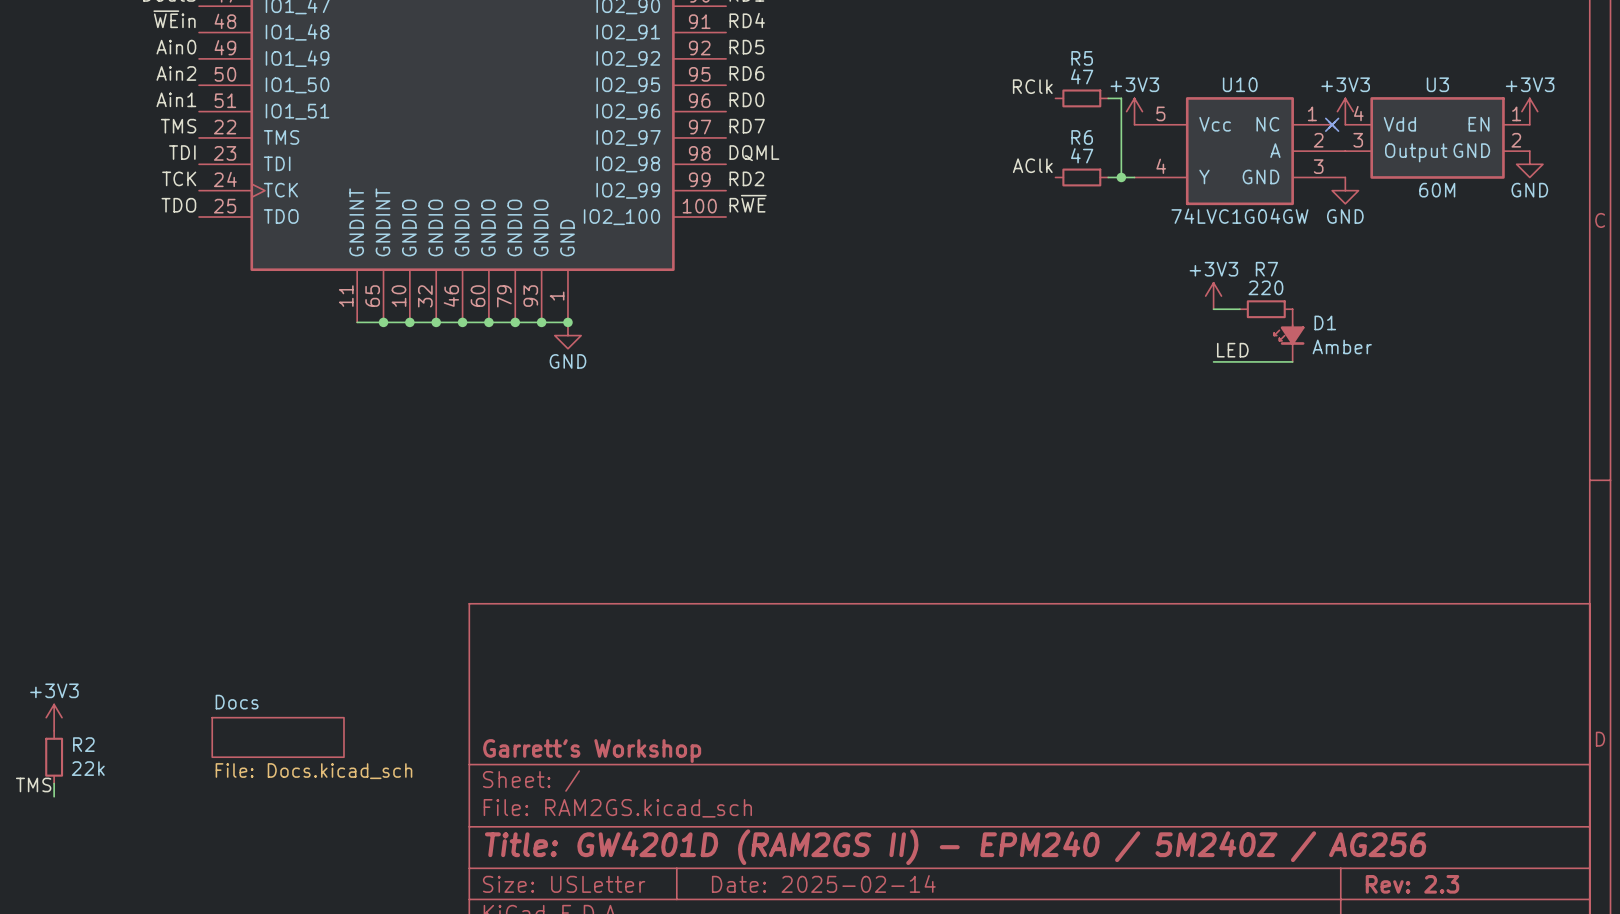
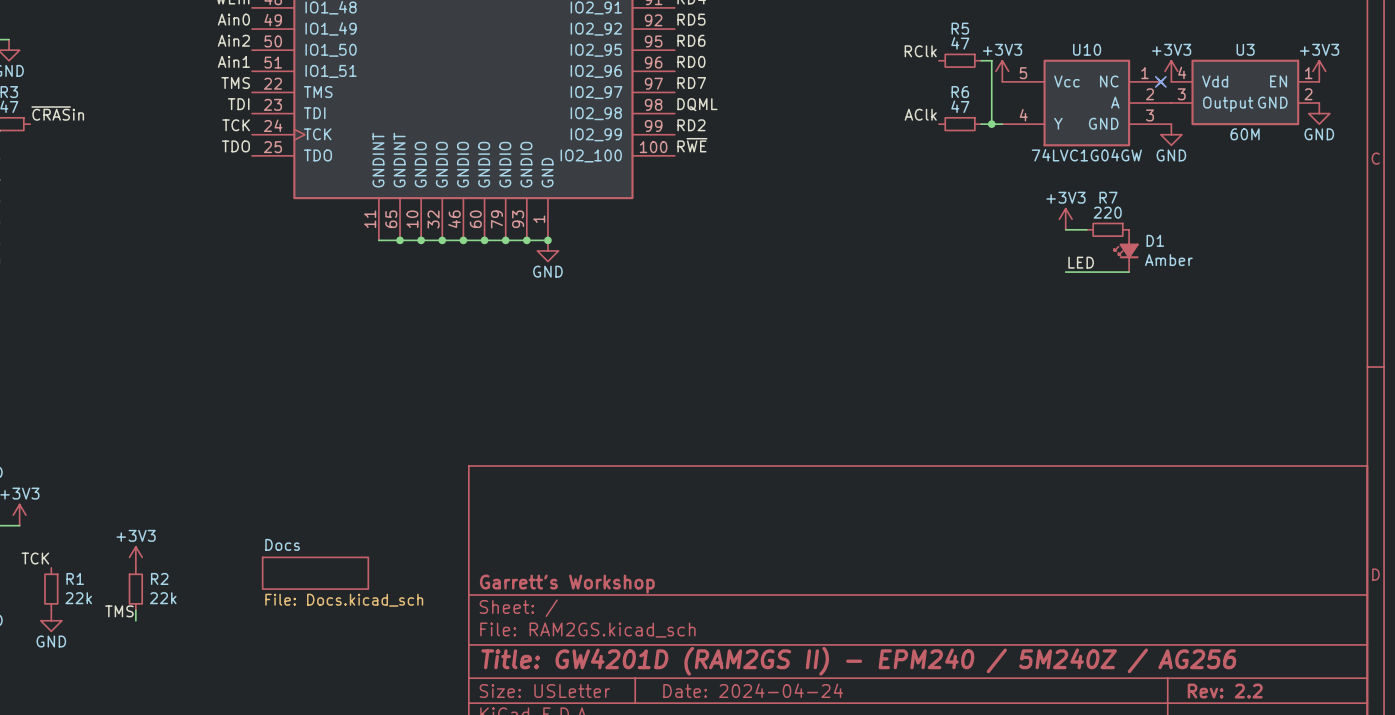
title block: Date: 2025-02-14 (823, 883) -> Date: 2024-04-24 (753, 690)
title block: Rev: 2.3 (1412, 884) -> Rev: 2.2 (1225, 691)

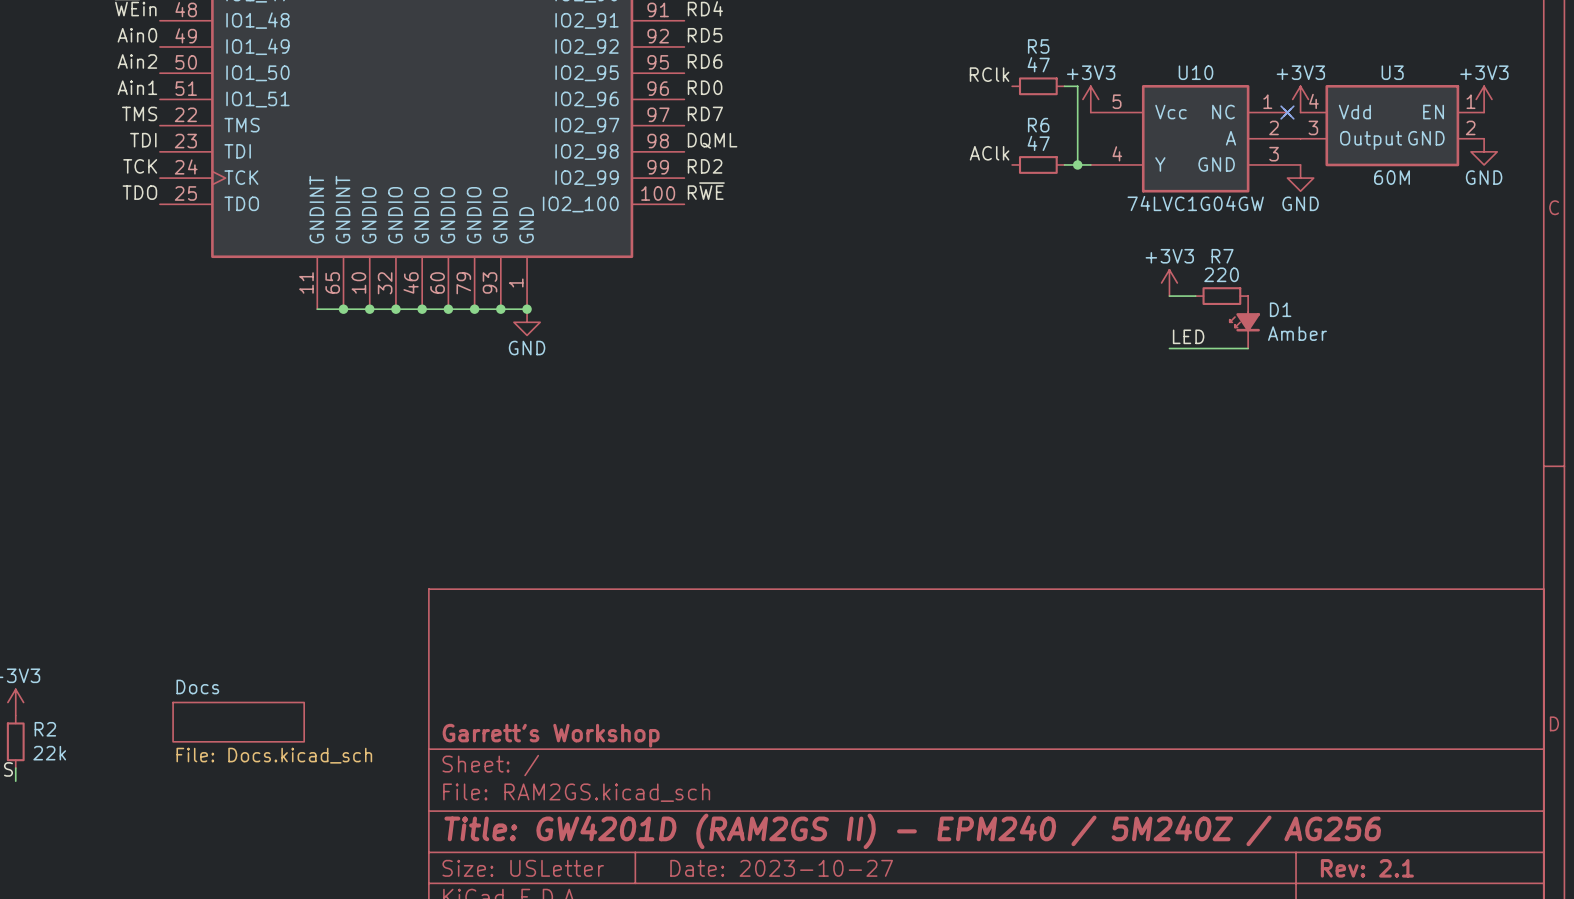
title block: Date: 2024-04-24 (753, 690) -> Date: 2023-10-27 (781, 868)
title block: Rev: 2.2 (1225, 691) -> Rev: 2.1 (1367, 868)

